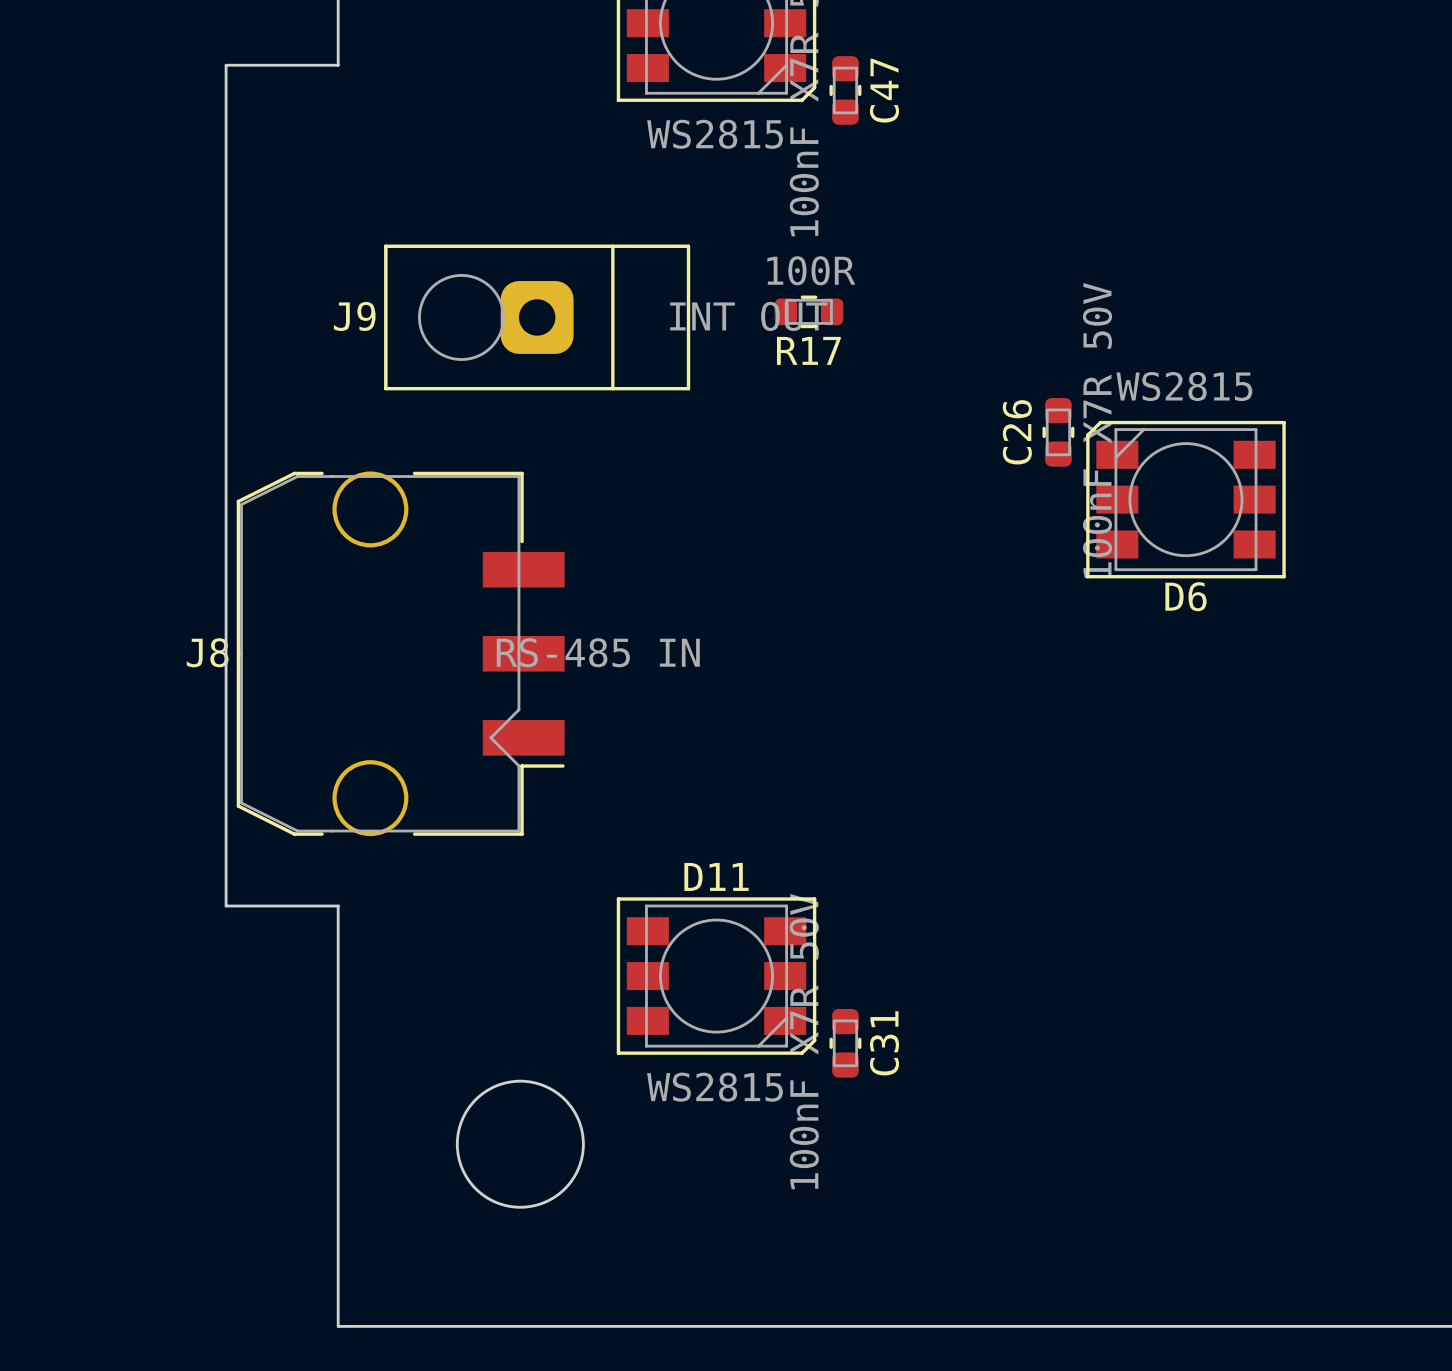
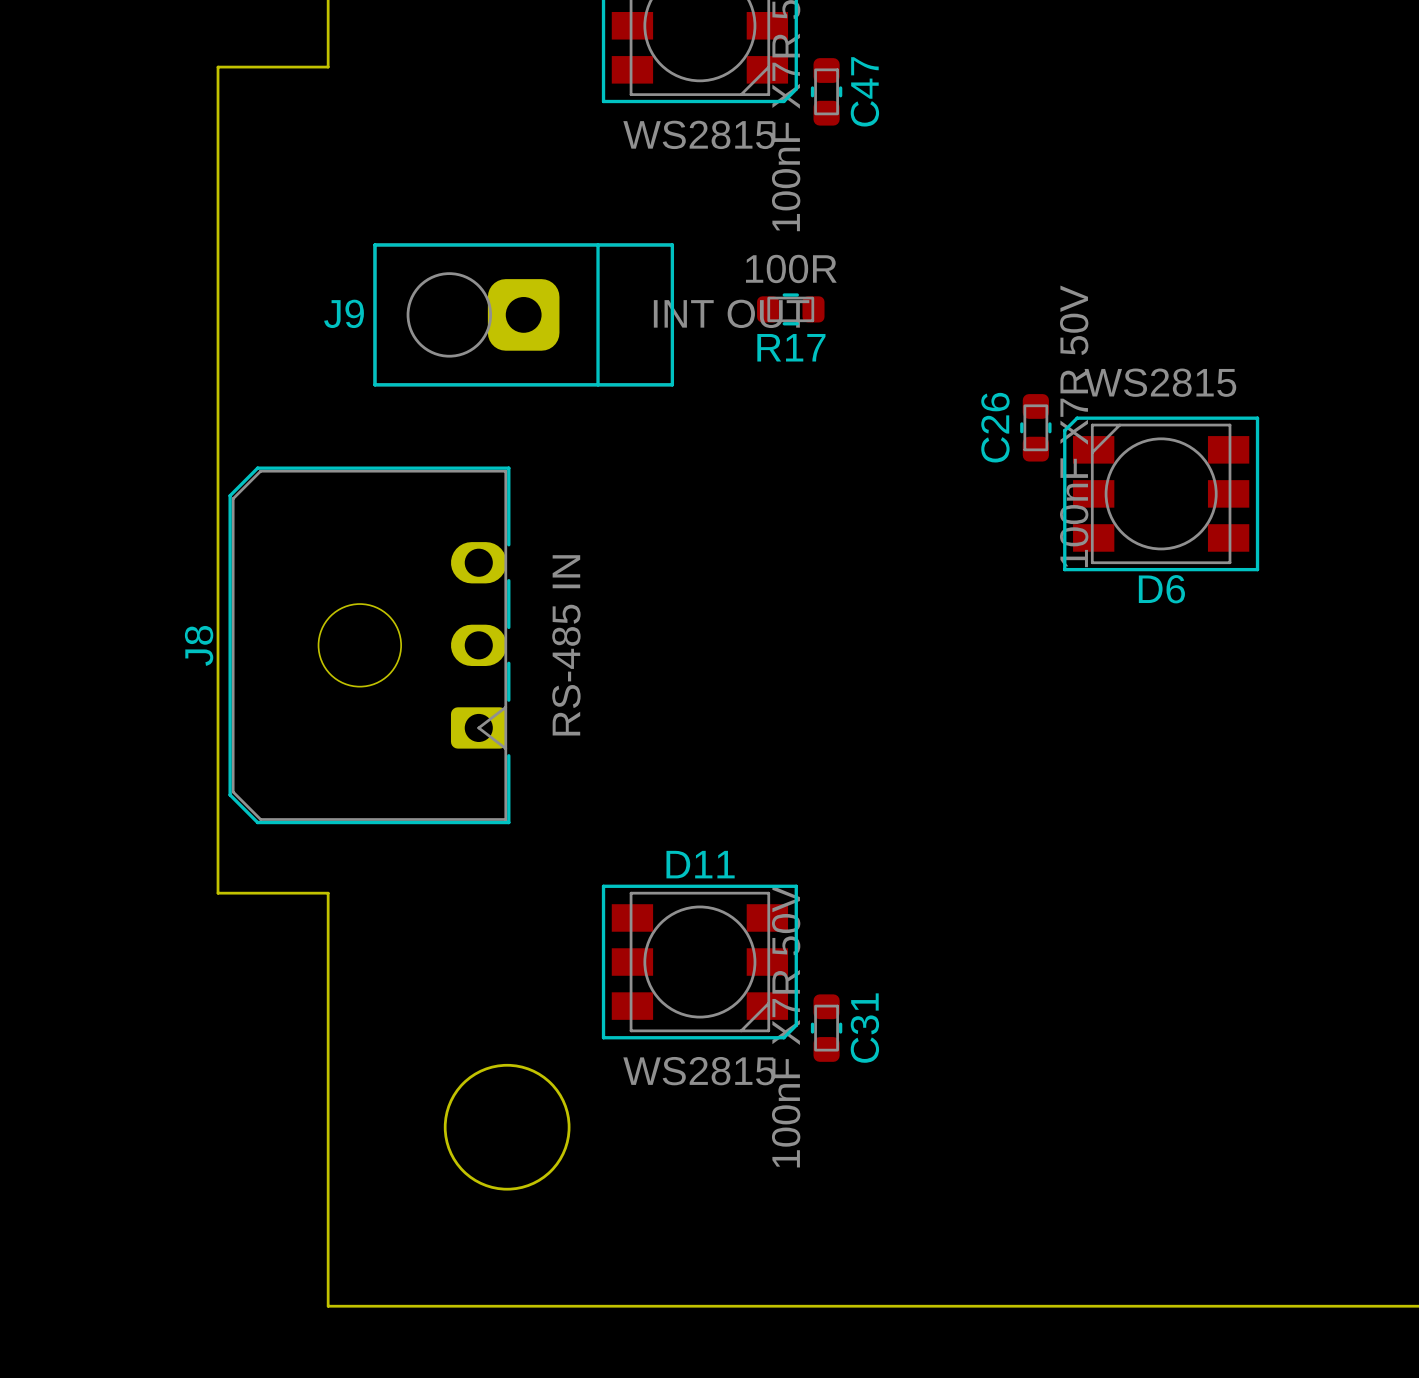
J8 footprint: [236, 471, 565, 837] -> [228, 466, 511, 825]

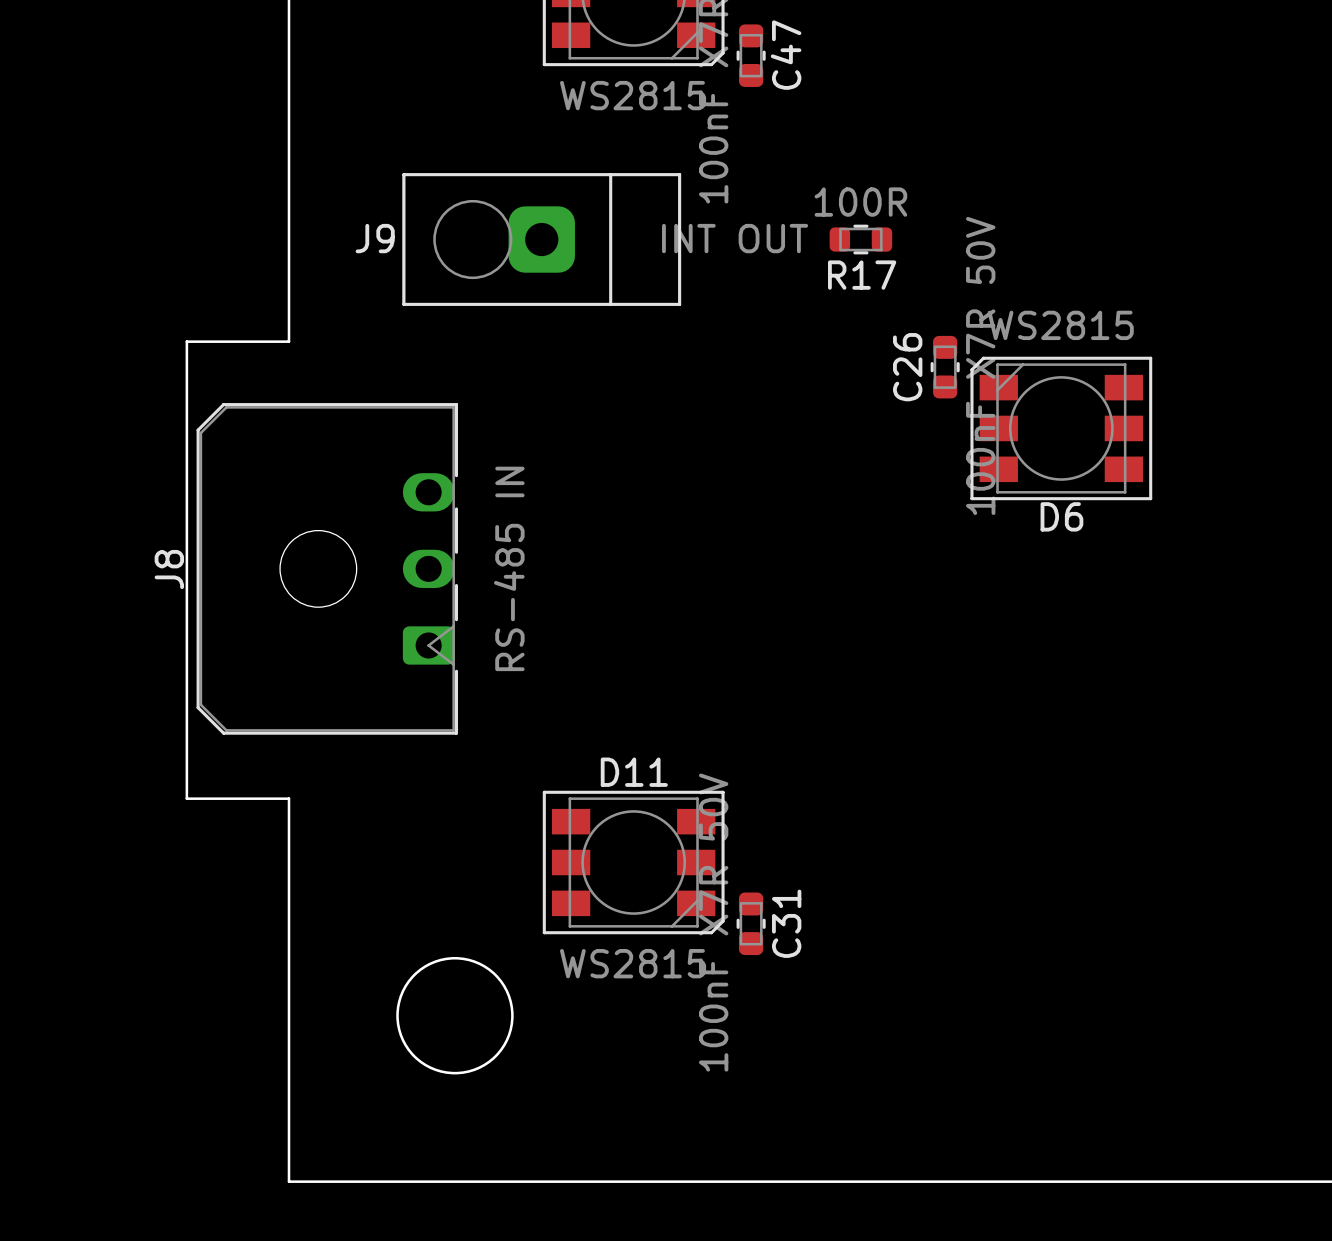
board edge: (328, 67) (218, 67) (218, 400) -> (288, 32) (288, 341) (186, 341)
R17 position: (790, 309) -> (860, 239)
J9 position: (523, 314) -> (541, 239)

